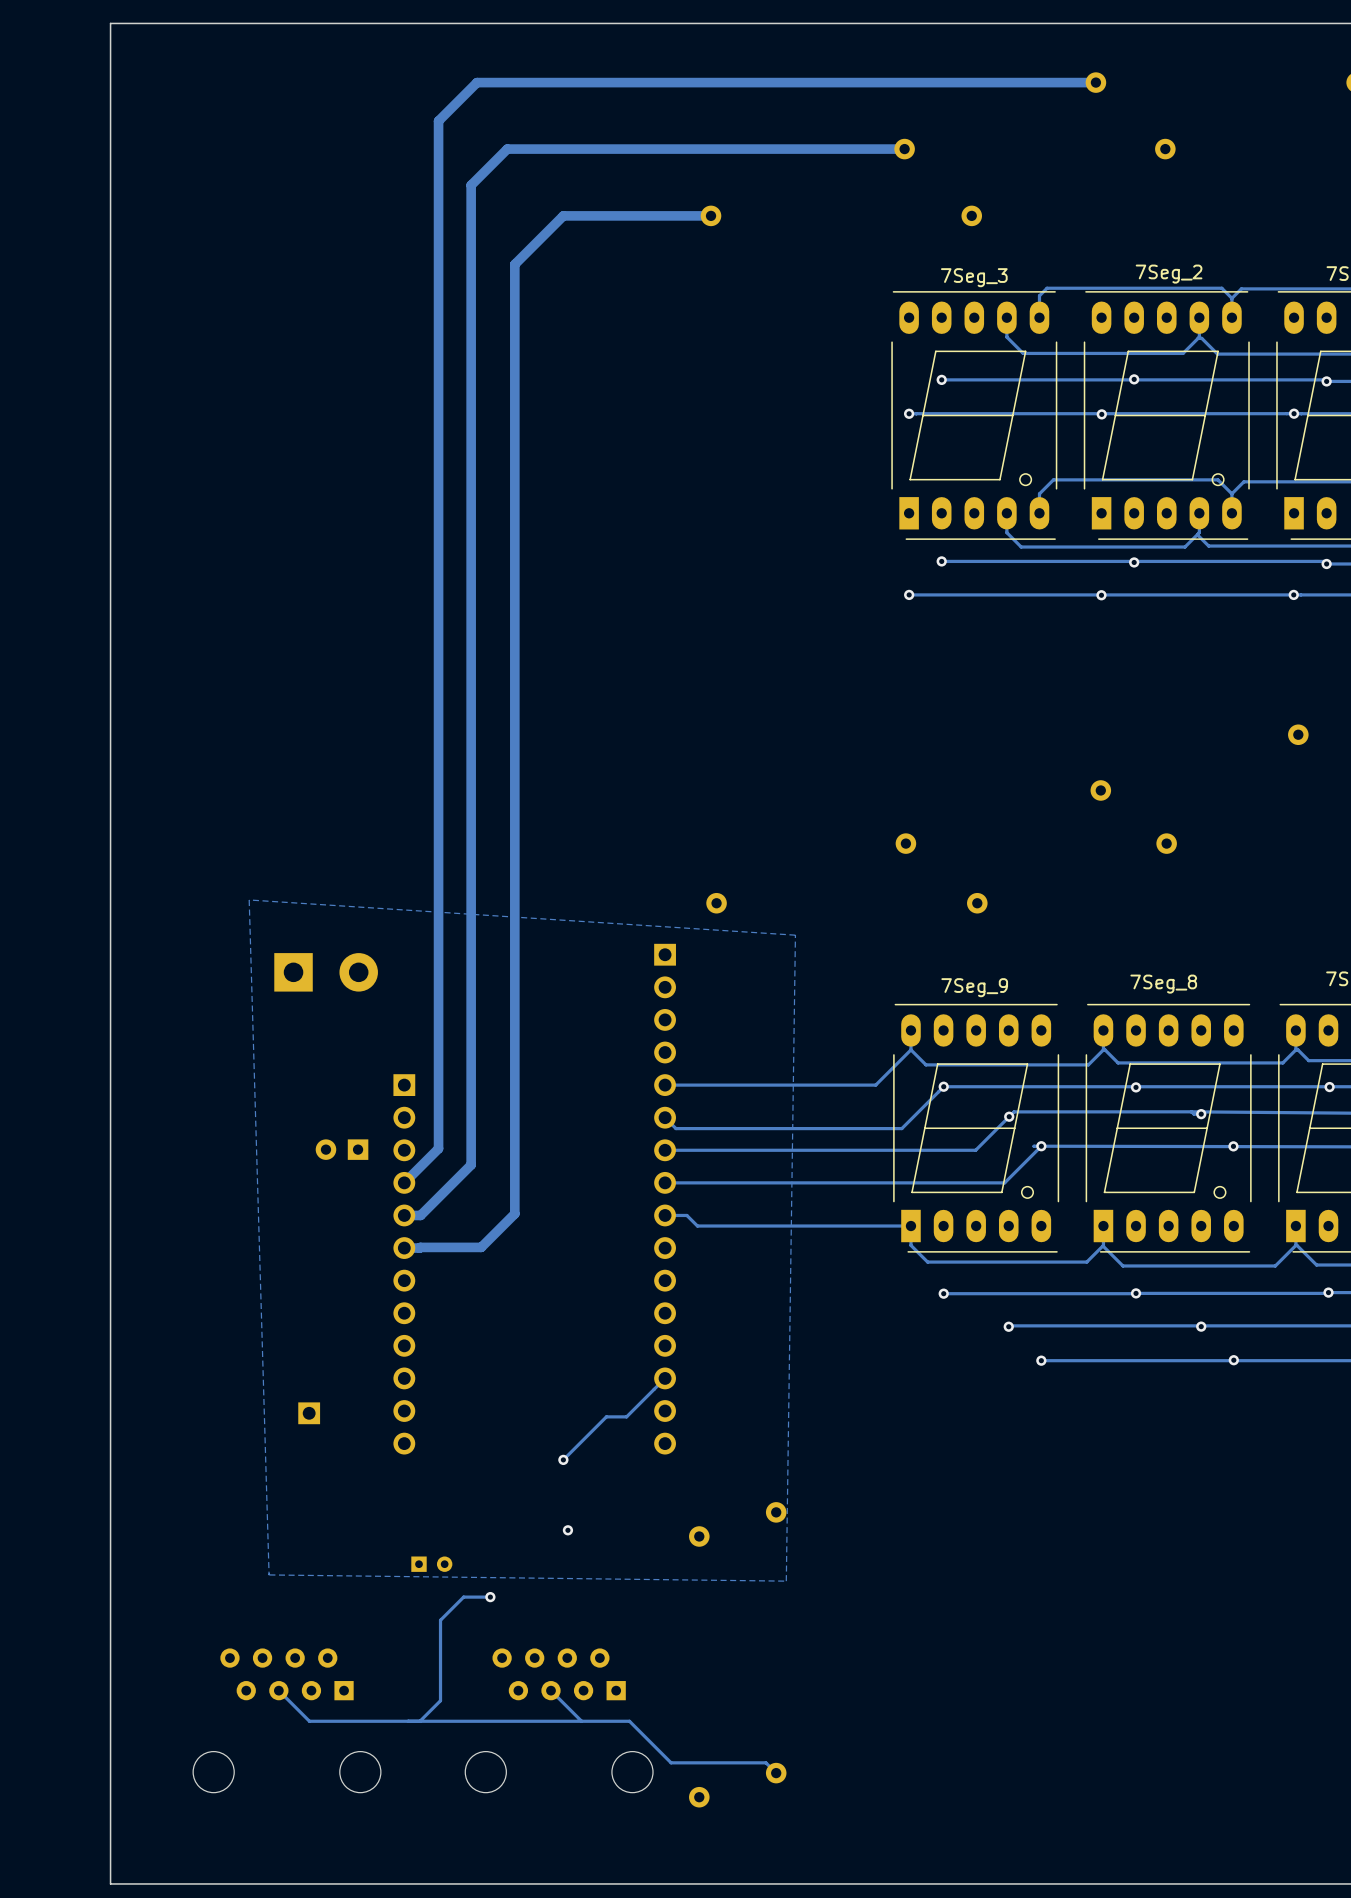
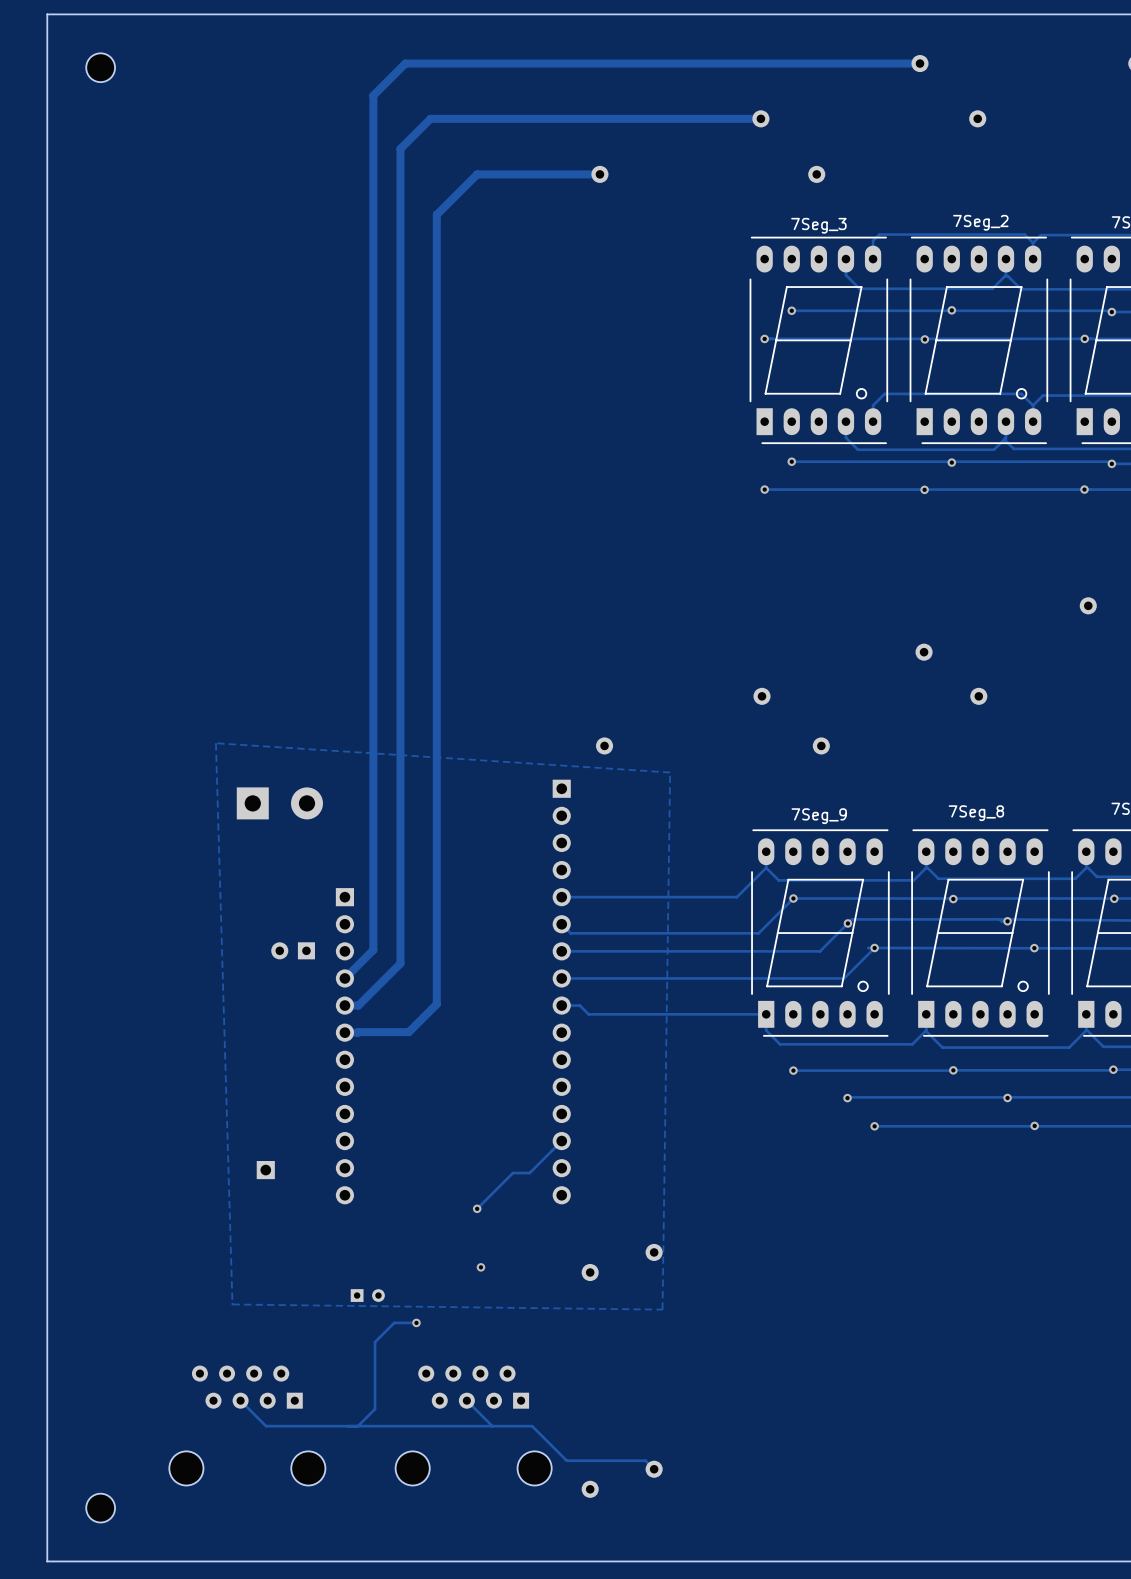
board edge: (110, 23) (110, 1883) -> (100, 14) (47, 14) (47, 1561) (100, 1561)
part: none -> (100, 67)
part: none -> (100, 1508)

